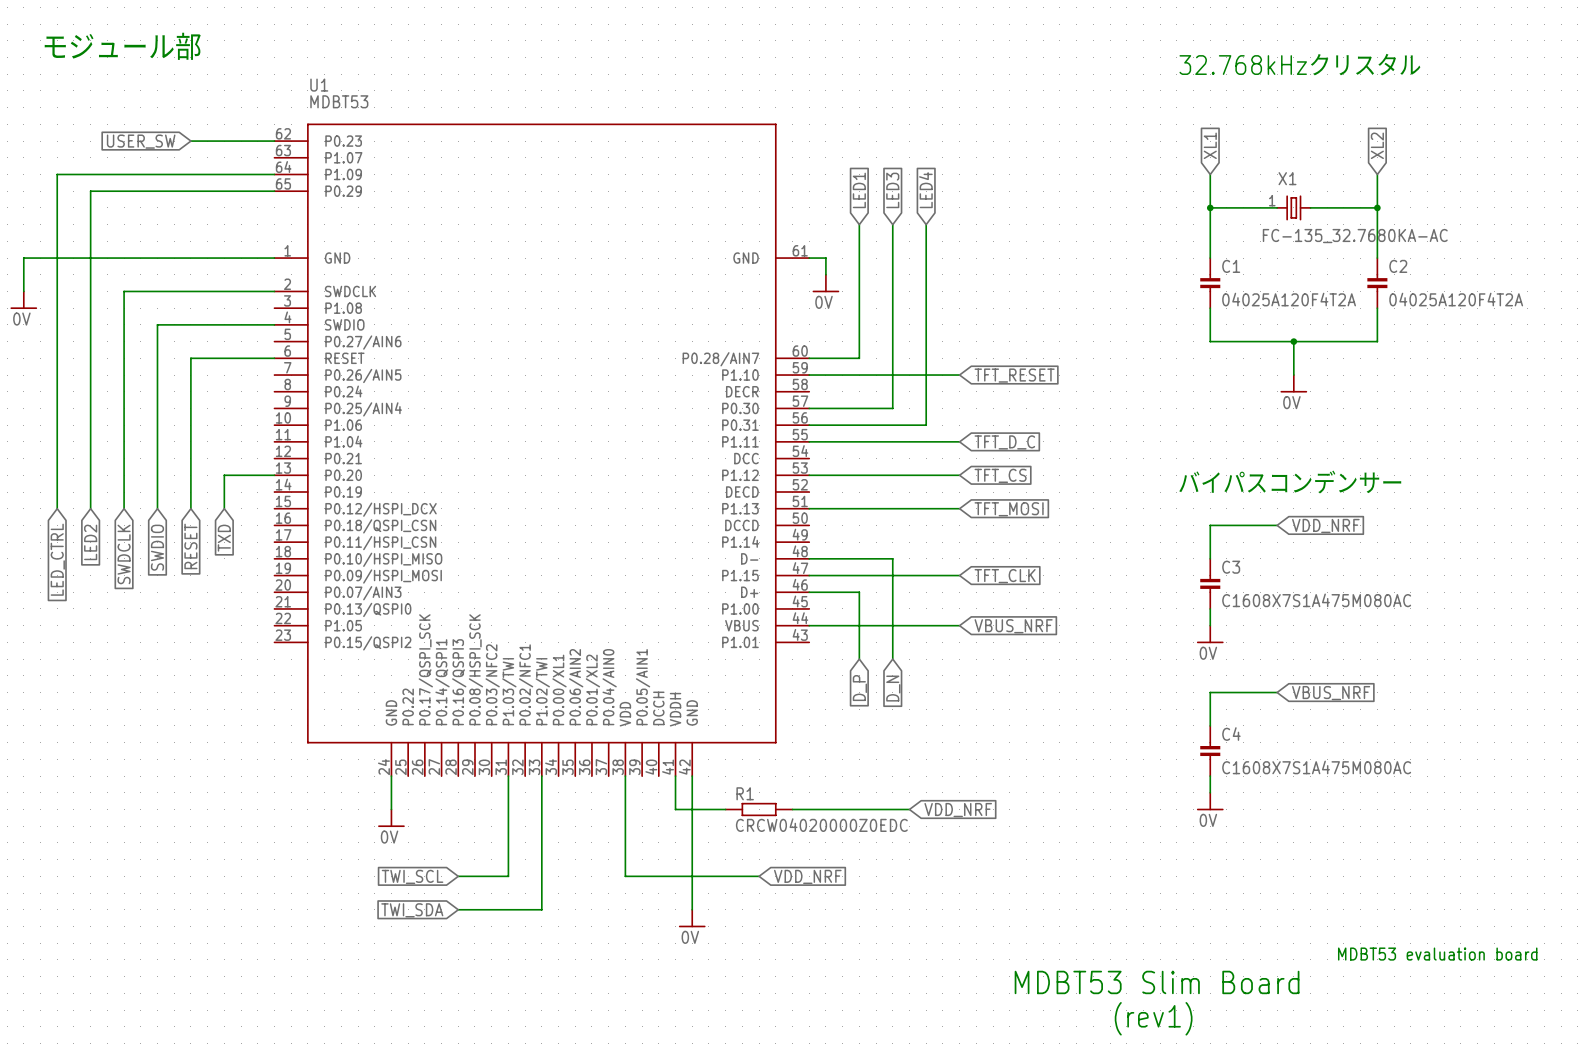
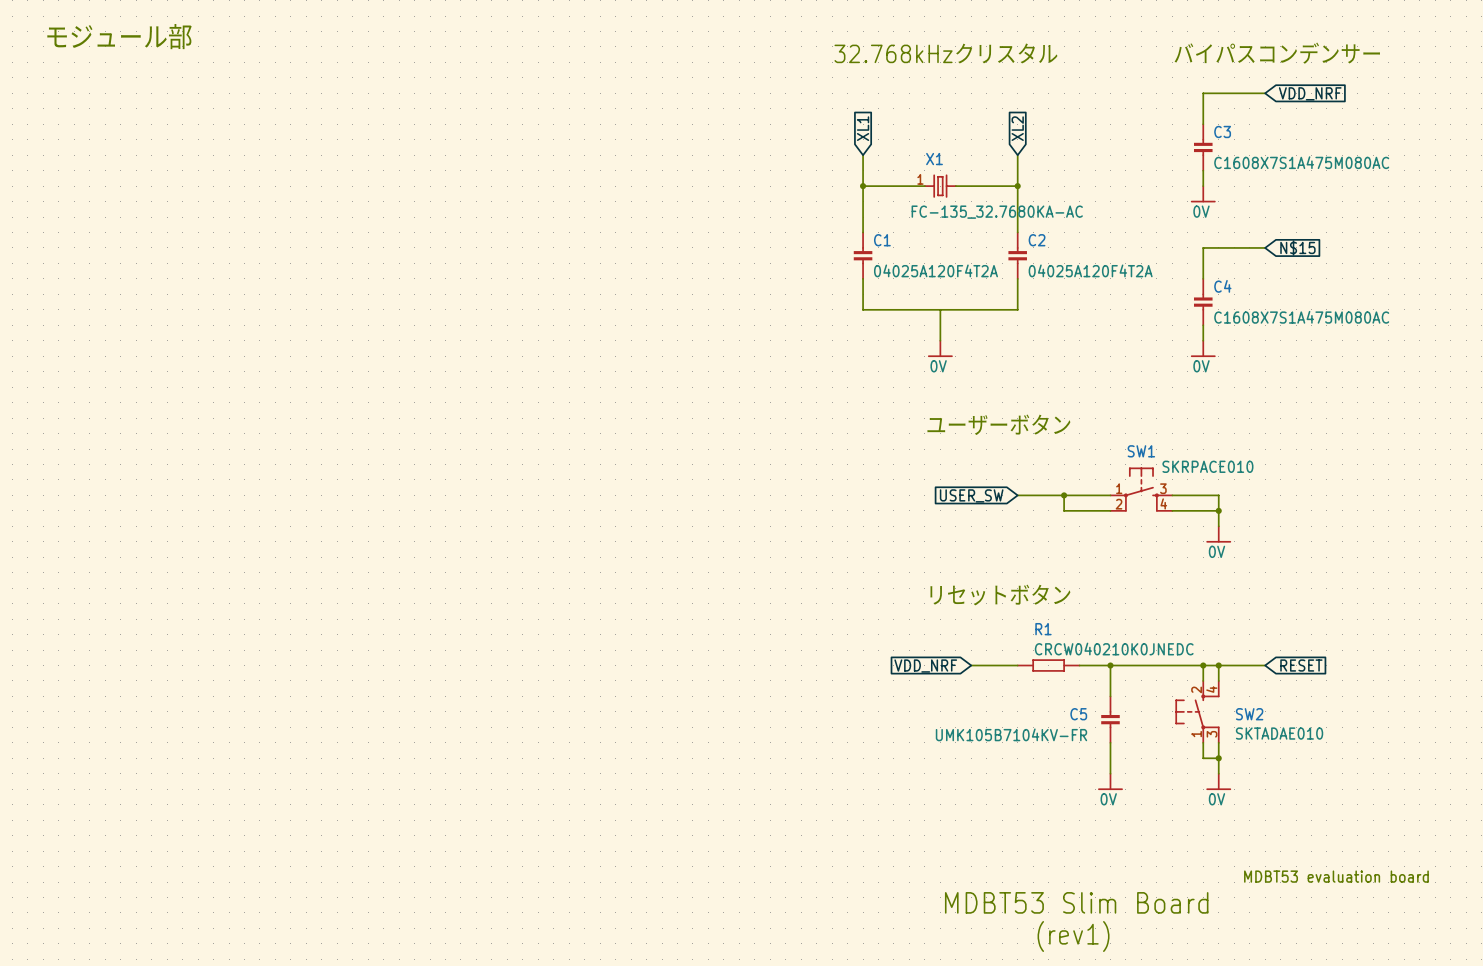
text: none -> 32.768kHzクリスタル (946, 53)
text: 32.768kHzクリスタル (1300, 64) -> none
text: none -> バイパスコンデンサー (1277, 53)
wire: none -> (1265, 93) (1203, 93) (1203, 124)
global label: none -> VDD_NRF (1310, 93)
global label: USER_SW (141, 141) -> none
wire: (190, 141) (274, 141) -> none
global label: none -> XL1 (863, 128)
global label: none -> XL2 (1017, 128)
global label: XL1 (1210, 145) -> none
global label: XL2 (1377, 145) -> none
wire: (274, 174) (57, 174) (57, 508) -> none
wire: (1210, 174) (1210, 258) -> (1017, 155) (1017, 232)
wire: (1377, 174) (1377, 258) -> none
global label: LED1 (859, 190) -> none
global label: LED3 (892, 190) -> none
global label: LED4 (925, 190) -> none
wire: (274, 191) (90, 191) (90, 508) -> none
wire: none -> (863, 186) (924, 186)
junction: none -> (863, 186)
wire: none -> (955, 186) (1017, 186)
junction: none -> (1017, 186)
wire: (1210, 207) (1277, 207) -> none
junction: (1210, 207) -> none
X1 position: (1293, 207) -> (940, 186)
wire: (1310, 207) (1377, 207) -> none
junction: (1377, 207) -> none
power symbol: none -> 0V (1203, 194)
wire: (859, 224) (859, 358) (809, 358) -> none
wire: (892, 224) (892, 408) (809, 408) -> none
wire: (274, 258) (23, 258) (23, 291) -> none
wire: (809, 258) (825, 258) (825, 274) -> none
wire: none -> (1265, 247) (1203, 247) (1203, 278)
global label: none -> N$15 (1297, 247)
power symbol: 0V (825, 283) -> none
C1 position: (1210, 283) -> (863, 255)
C2 position: (1377, 283) -> (1017, 255)
wire: (274, 291) (124, 291) (124, 508) -> none
power symbol: 0V (23, 300) -> none
wire: (1210, 308) (1210, 341) (1377, 341) (1377, 308) -> none
wire: (274, 324) (157, 324) (157, 508) -> none
wire: (926, 341) (926, 425) (809, 425) -> (863, 309) (1017, 309) (1017, 278)
wire: none -> (940, 309) (940, 340)
junction: (1293, 341) -> none
wire: (274, 358) (190, 358) (190, 508) -> none
wire: (809, 375) (959, 375) -> none
global label: TFT_RESET (1014, 375) -> none
power symbol: none -> 0V (940, 348)
wire: (809, 441) (959, 441) -> none
global label: TFT_D_C (1004, 442) -> none
U1: MDBT53 (541, 449) -> none
text: none -> ユーザーボタン (998, 424)
wire: (274, 475) (224, 475) (224, 508) -> none
wire: (809, 475) (959, 475) -> none
global label: TFT_CS (1000, 475) -> none
text: バイパスコンデンサー (1290, 482) -> none
wire: (809, 508) (959, 508) -> none
global label: TFT_MOSI (1009, 509) -> none
wire: (1277, 525) (1210, 525) (1210, 558) -> none
global label: VDD_NRF (1325, 525) -> none
SW1: none -> SKRPACE010 (1141, 489)
global label: TXD (224, 538) -> none
global label: LED2 (90, 542) -> none
global label: none -> USER_SW (971, 495)
wire: none -> (1017, 495) (1110, 495)
wire: none -> (1064, 495) (1064, 510) (1110, 510)
junction: none -> (1064, 495)
wire: none -> (1172, 495) (1218, 495) (1218, 526)
global label: RESET (190, 546) -> none
global label: SWDIO (157, 547) -> none
global label: SWDCLK (124, 554) -> none
wire: (809, 558) (892, 558) (892, 659) -> none
wire: none -> (1172, 510) (1218, 510)
junction: none -> (1218, 510)
global label: LED_CTRL (57, 559) -> none
wire: (809, 575) (959, 575) -> none
global label: TFT_CLK (1005, 576) -> none
C3 position: (1210, 583) -> (1203, 147)
power symbol: none -> 0V (1218, 534)
wire: (809, 592) (859, 592) (859, 659) -> none
wire: (1210, 608) (1210, 625) -> (1218, 665) (1218, 680)
wire: (809, 625) (959, 625) -> none
global label: VBUS_NRF (1013, 626) -> none
power symbol: 0V (1210, 634) -> none
text: none -> リセットボタン (1000, 595)
global label: D_P (859, 688) -> none
global label: D_N (893, 688) -> none
wire: (1277, 692) (1210, 692) (1210, 725) -> none
global label: VBUS_NRF (1331, 693) -> none
wire: none -> (971, 665) (1017, 665)
wire: none -> (1079, 665) (1265, 665)
wire: none -> (1110, 665) (1110, 696)
junction: none -> (1110, 665)
junction: none -> (1203, 665)
junction: none -> (1218, 665)
global label: none -> RESET (1301, 665)
global label: none -> VDD_NRF (925, 666)
C4 position: (1210, 751) -> (1203, 302)
wire: (391, 776) (391, 809) -> none
wire: (508, 776) (508, 876) (458, 876) -> none
wire: (541, 776) (541, 909) (458, 909) -> none
wire: (625, 776) (625, 876) (759, 876) -> none
wire: (675, 776) (675, 809) (725, 809) -> none
wire: (692, 776) (692, 909) -> none
wire: (1210, 776) (1210, 792) -> (1203, 665) (1203, 680)
SW2: none -> SKTADAE010 (1197, 711)
C5: none -> UMK105B7104KV-FR (1110, 719)
R1 name position: R1 (745, 793) -> R1 (1043, 629)
power symbol position: 0V (1210, 801) -> 0V (1110, 781)
R1 position: (759, 809) -> (1048, 665)
wire: (792, 809) (909, 809) -> none
wire: none -> (1110, 742) (1110, 773)
wire: none -> (1203, 742) (1203, 758) (1218, 758)
wire: none -> (1218, 742) (1218, 773)
global label: VDD_NRF (958, 810) -> none
power symbol: 0V (391, 818) -> none
R1 value: CRCW04020000Z0EDC (821, 825) -> CRCW040210K0JNEDC (1114, 649)
junction: none -> (1218, 758)
power symbol: none -> 0V (1218, 781)
global label: TWI_SCL (412, 876) -> none
global label: VDD_NRF (807, 876) -> none
global label: TWI_SDA (412, 910) -> none
power symbol: 0V (692, 918) -> none

